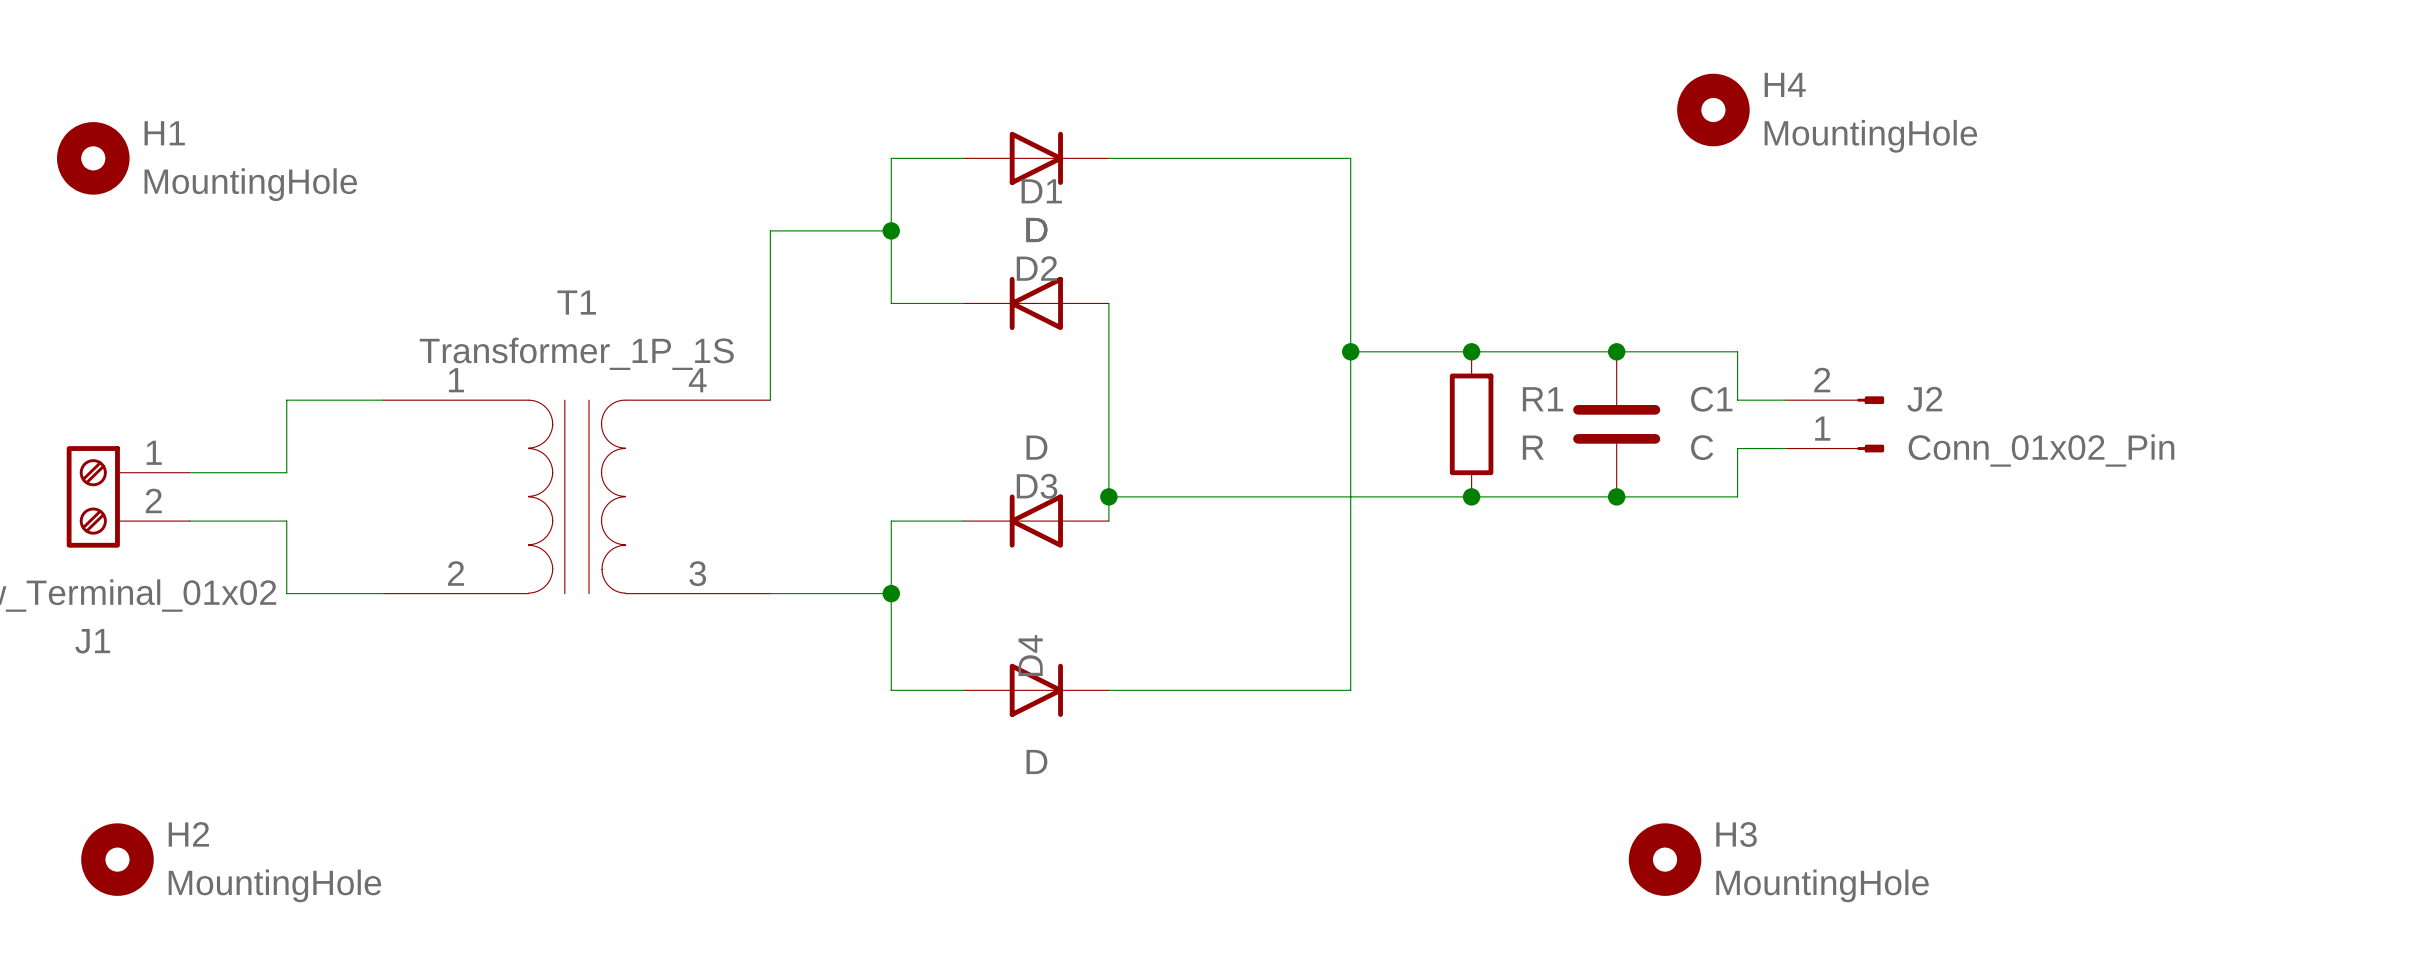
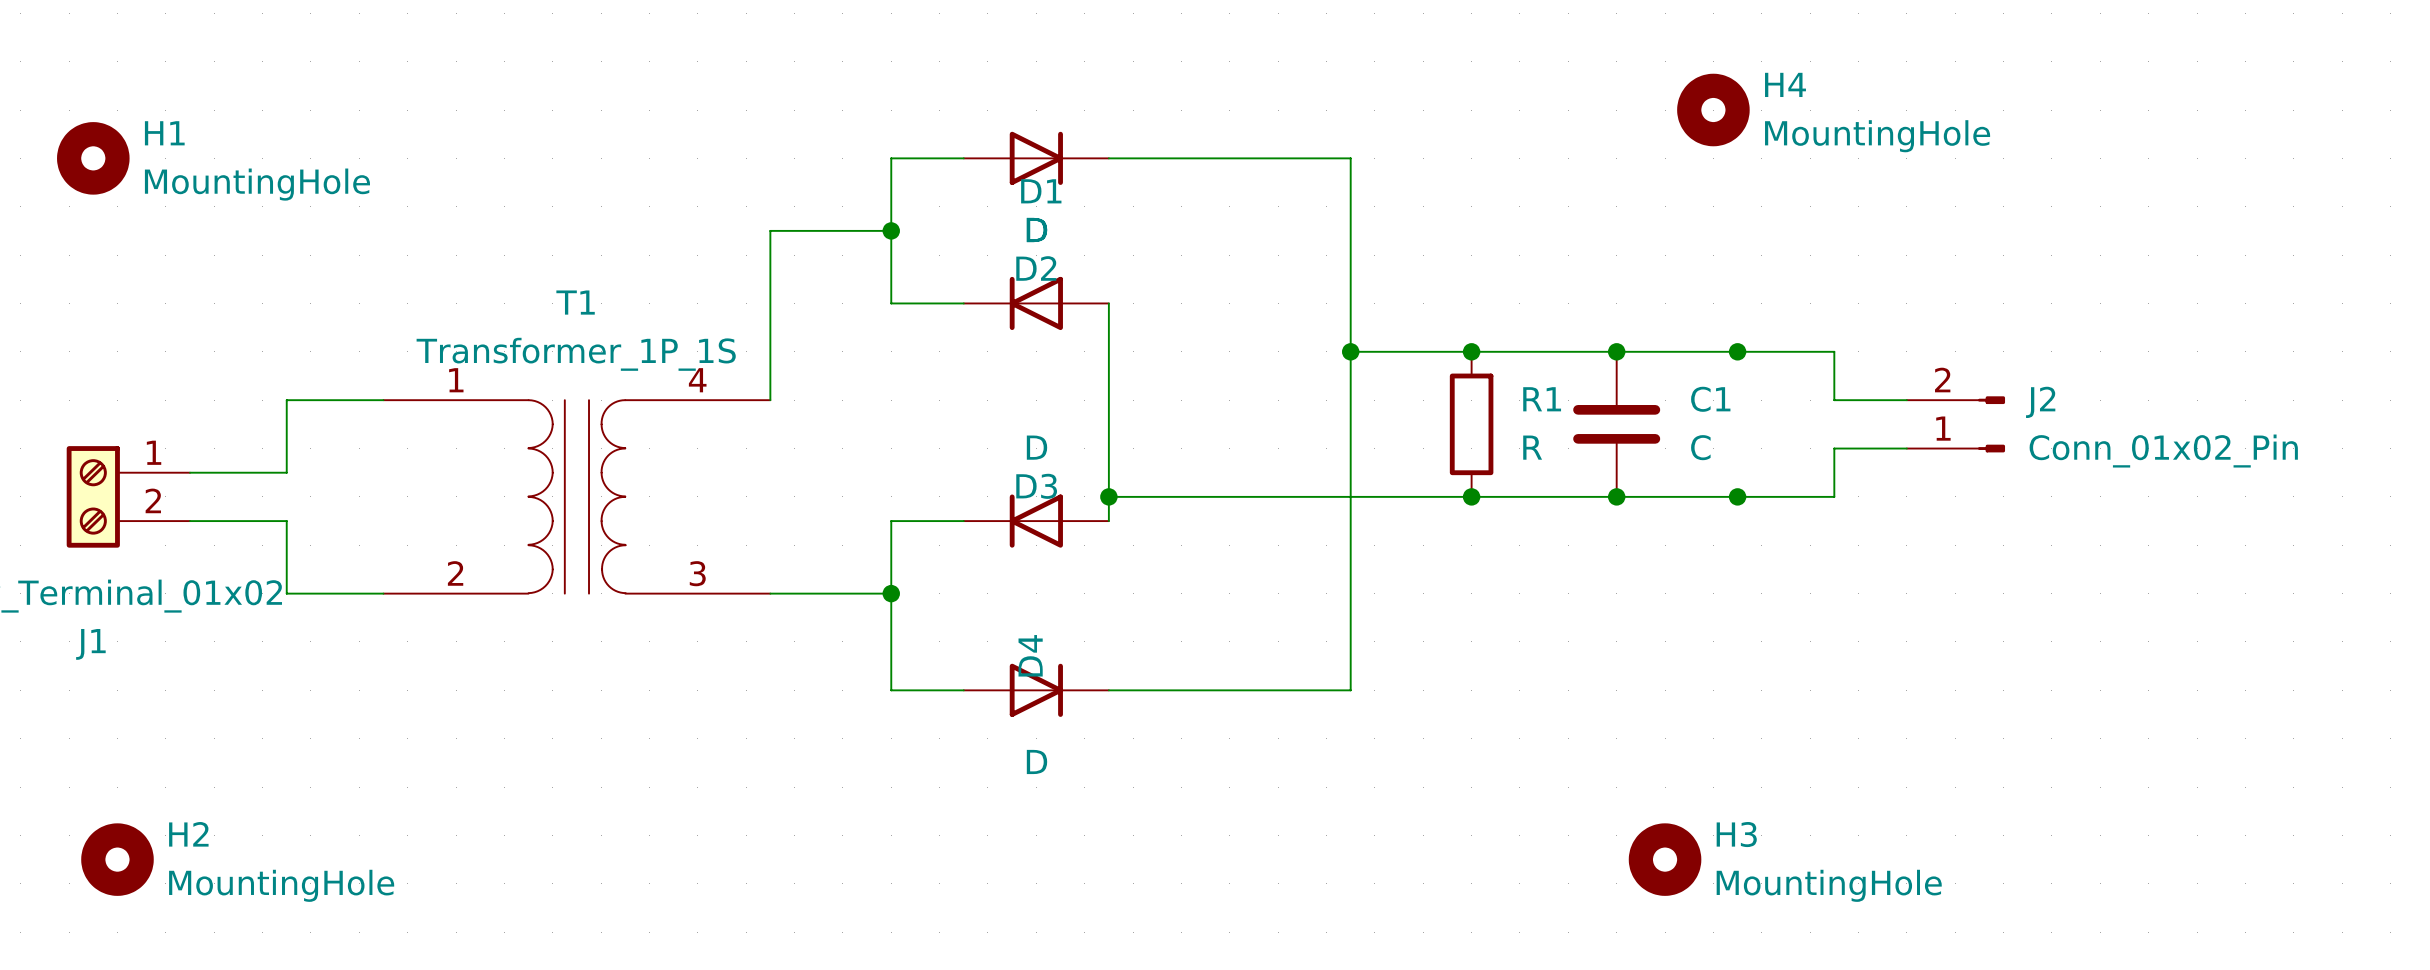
wire: (1737, 351) (1737, 400) (1785, 400) -> (1737, 351) (1834, 351) (1834, 400) (1906, 400)
junction: none -> (1737, 351)
J2 position: (1835, 424) -> (1955, 424)
wire: (1785, 448) (1737, 448) (1737, 496) -> (1906, 448) (1834, 448) (1834, 496) (1737, 496)
junction: none -> (1737, 496)

